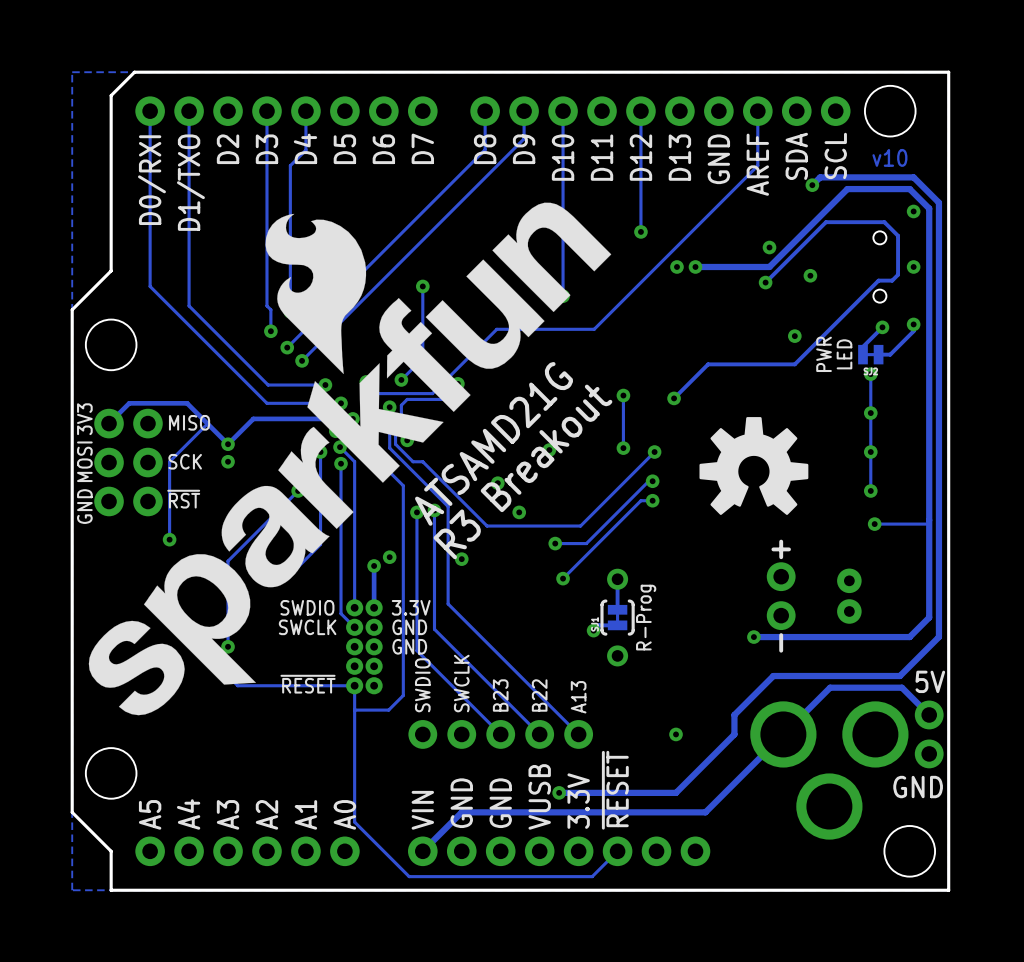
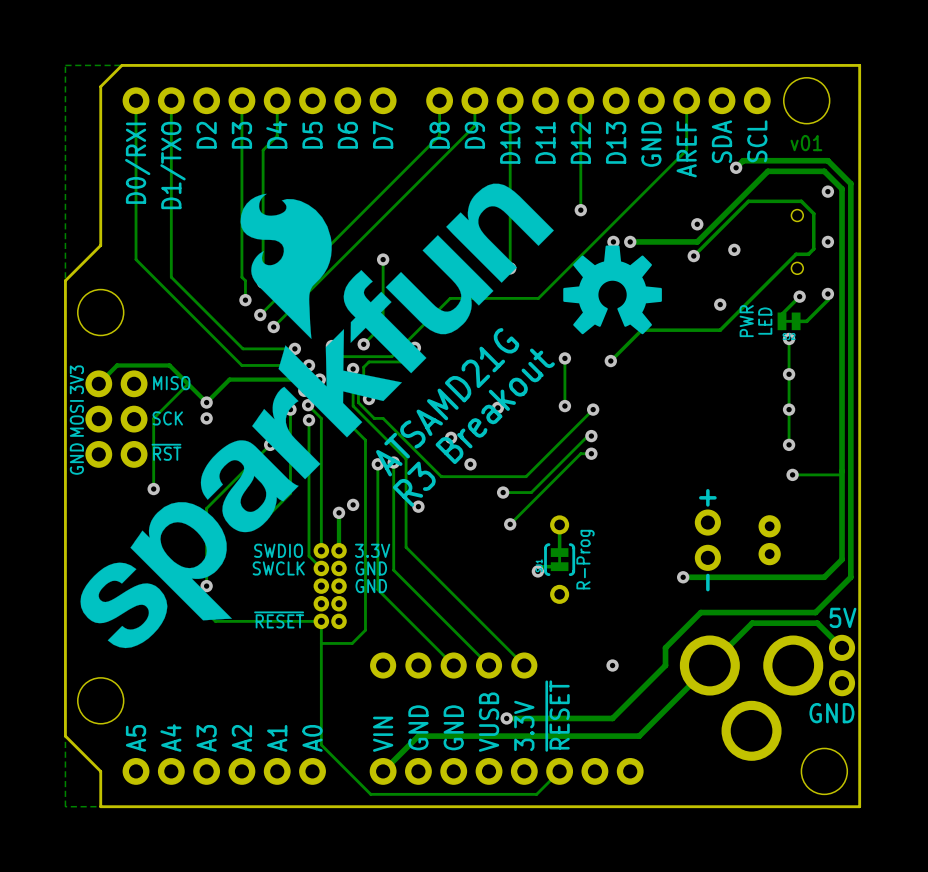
text: v10 (889, 157) -> v01 (806, 143)
drawing position: (753, 466) -> (612, 289)
text: SWCLK (461, 683) -> none
text: SWDIO (422, 685) -> none
text: B23 (500, 695) -> none
text: B22 (539, 695) -> none
text: A13 (578, 697) -> none

